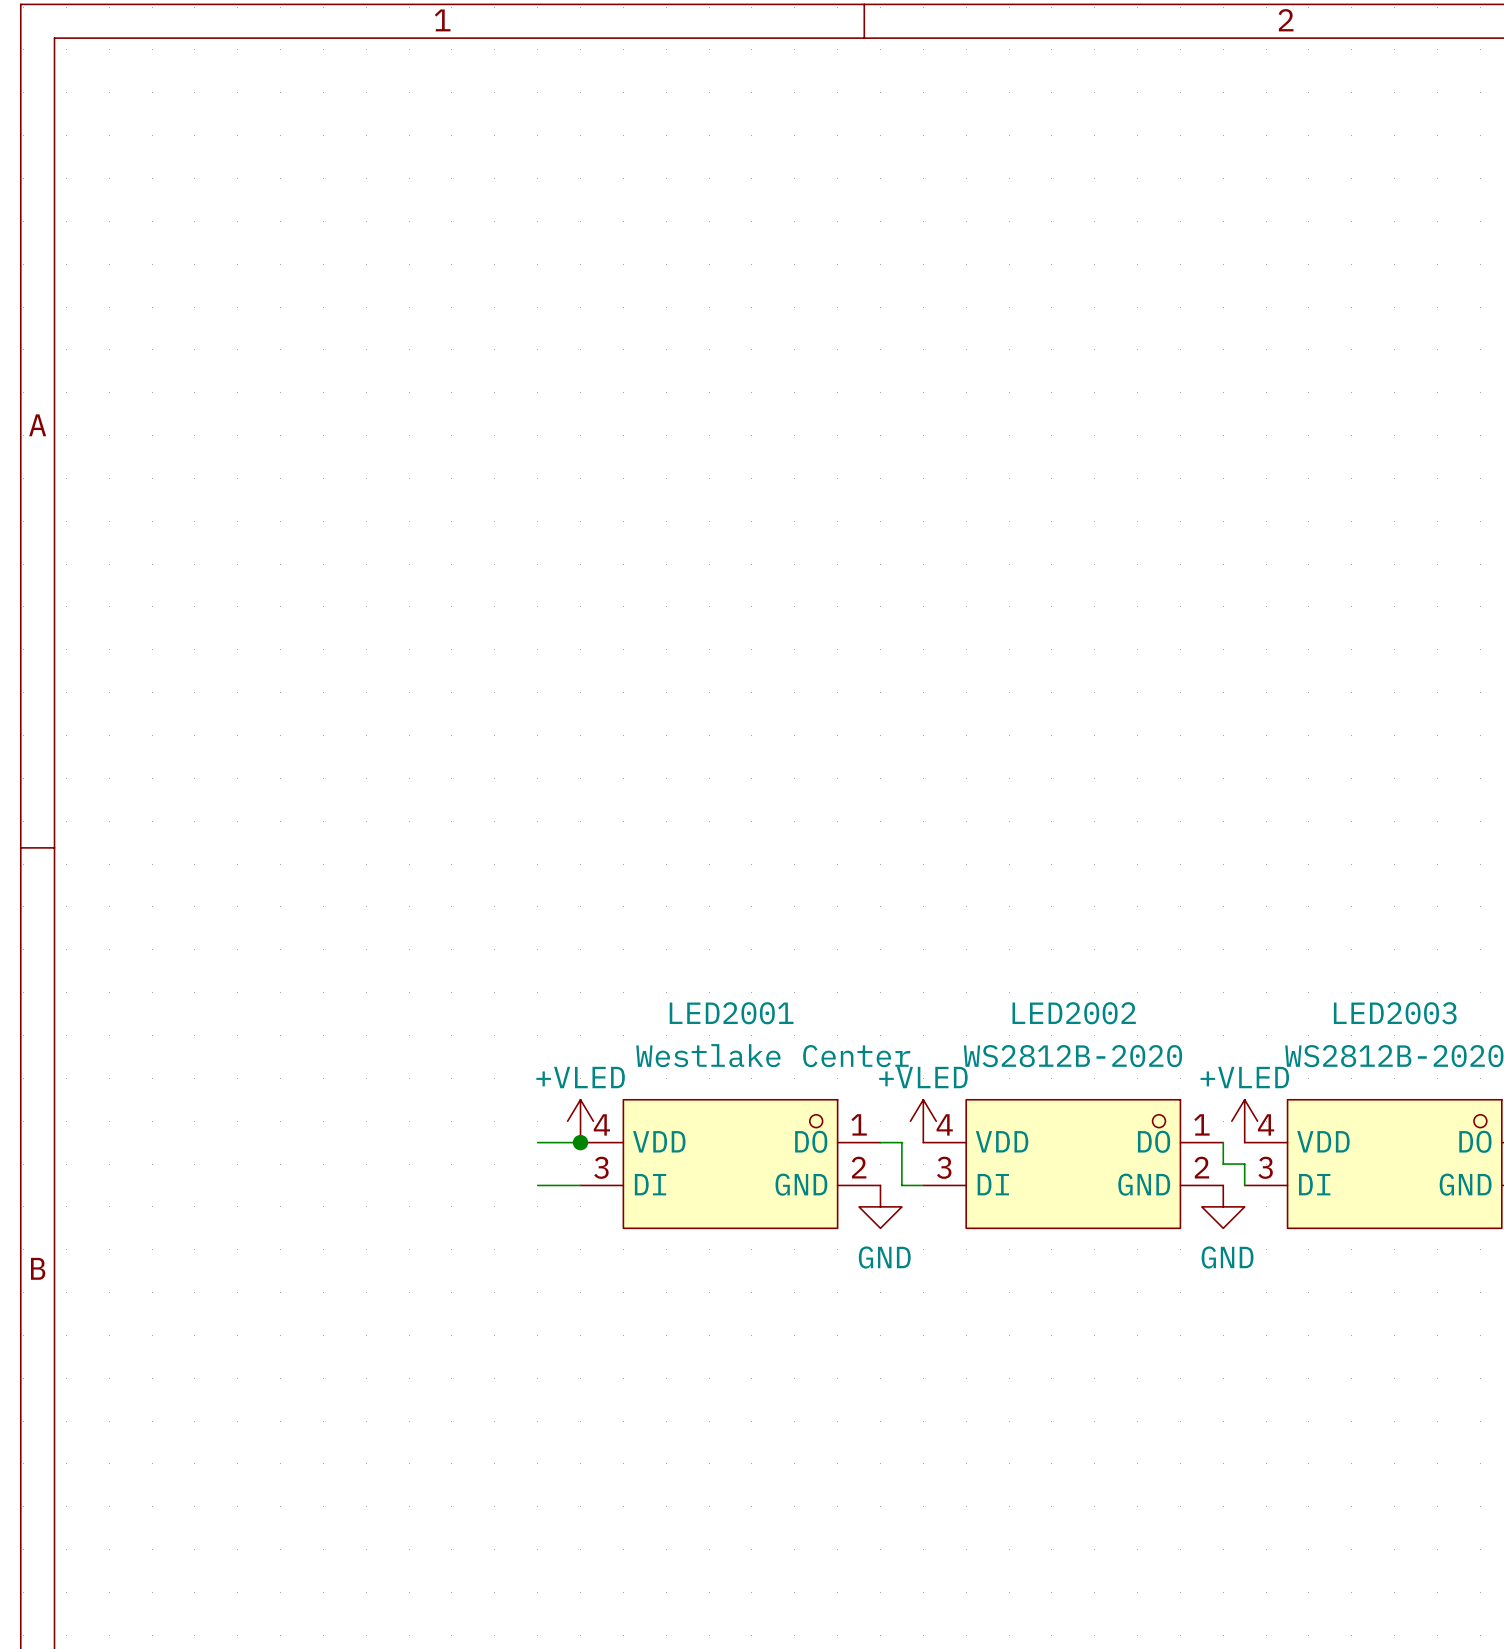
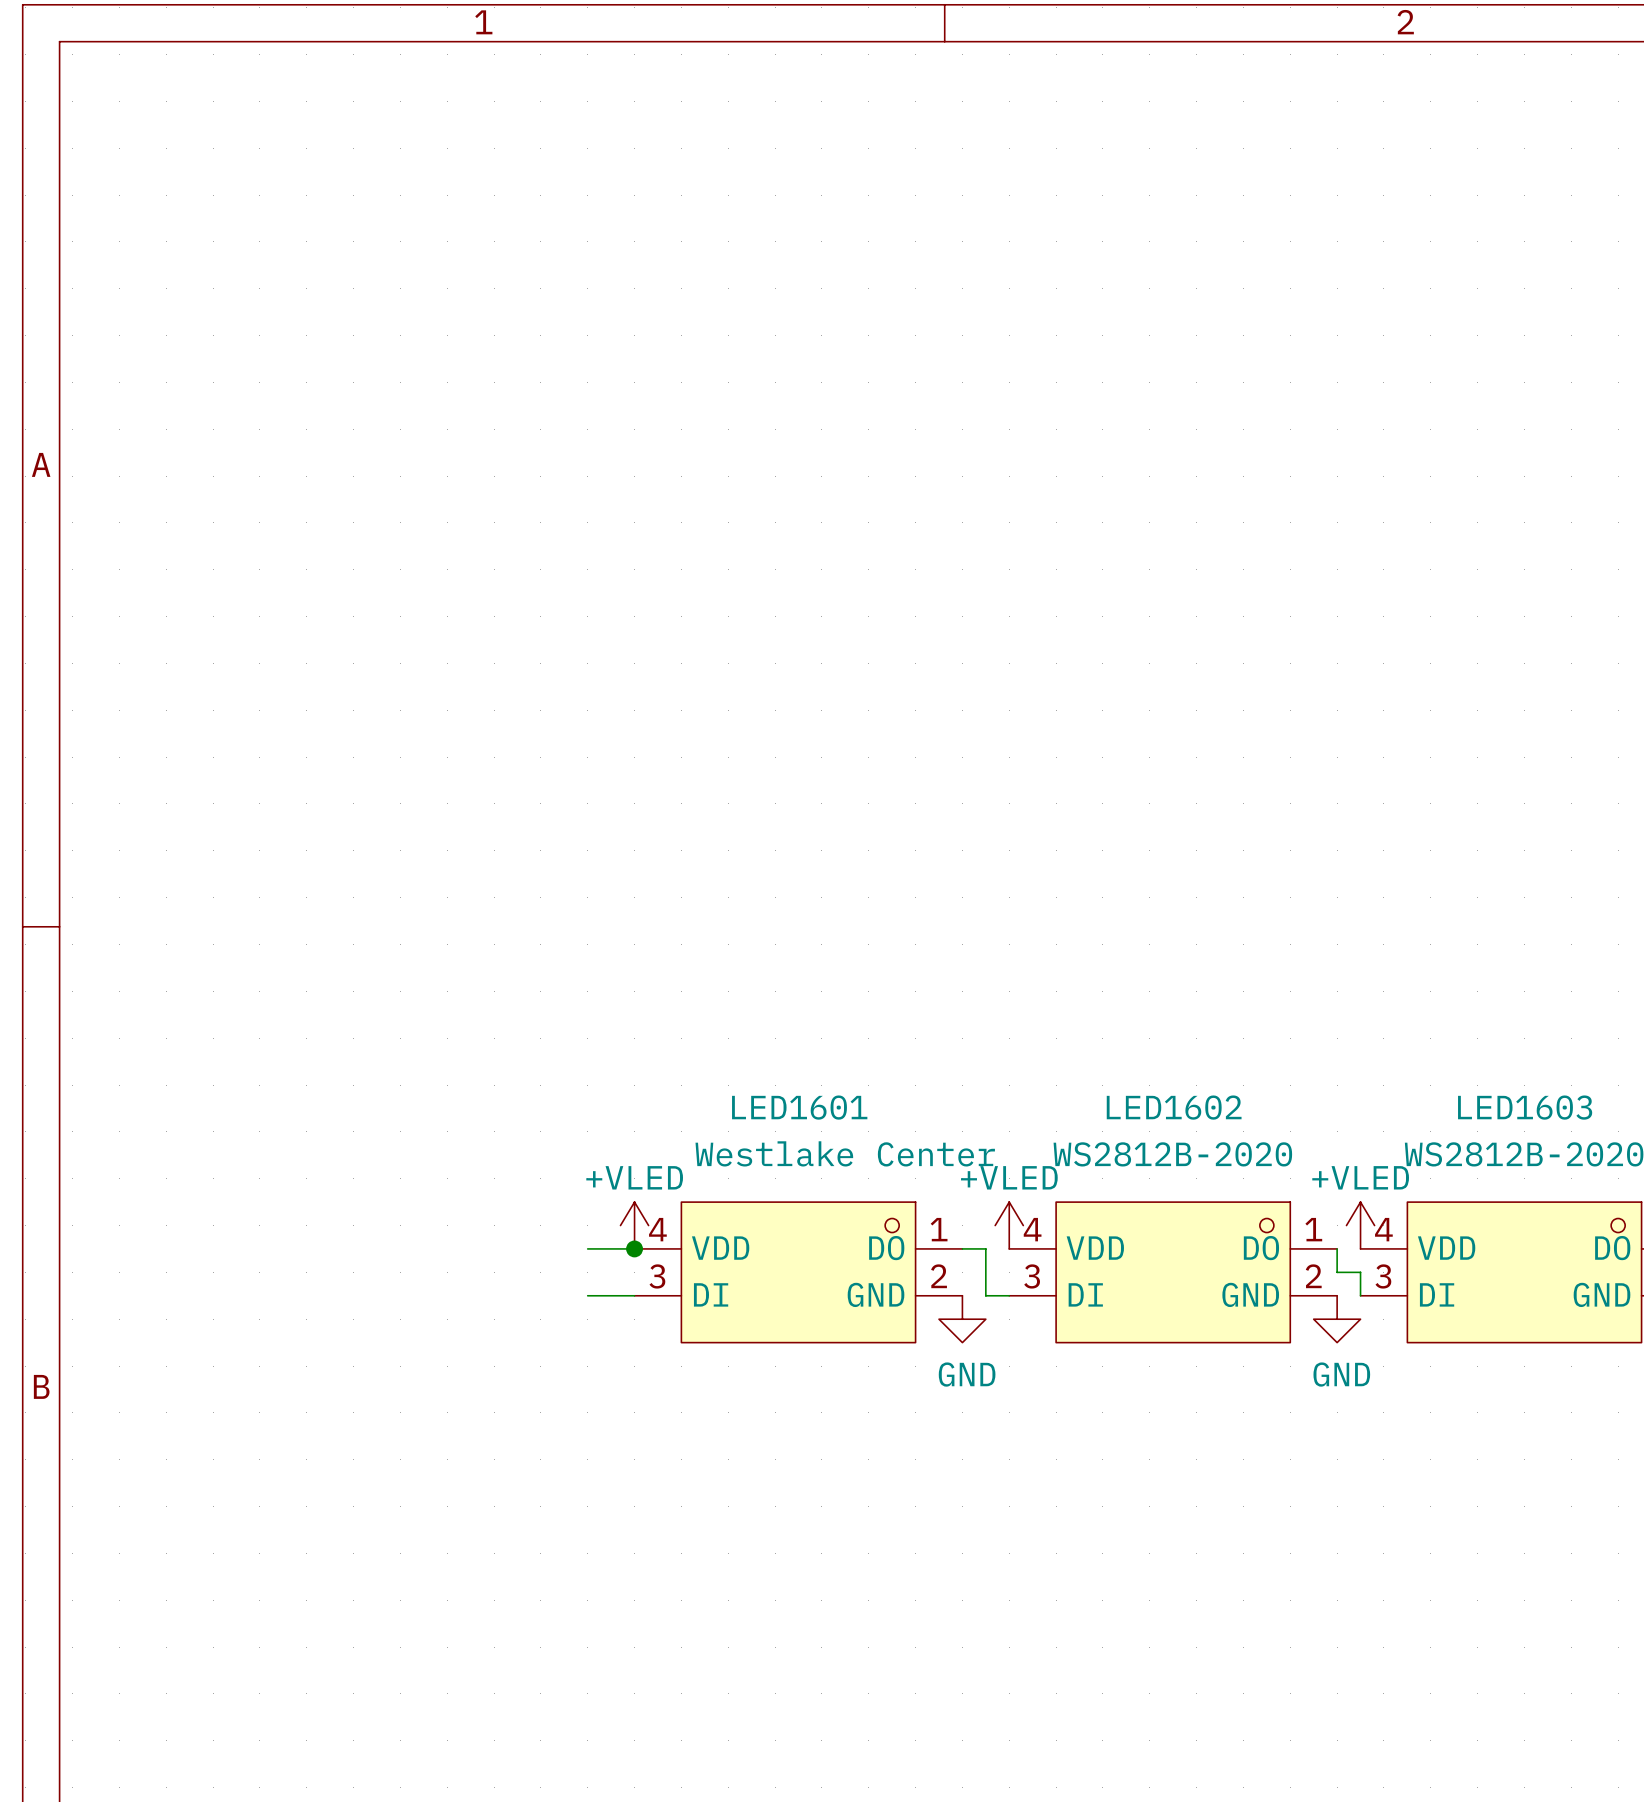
LED2001 name: LED2001 (731, 1013) -> LED1601 (799, 1107)
LED2002 name: LED2002 (1074, 1013) -> LED1602 (1174, 1107)
LED2003 name: LED2003 (1395, 1013) -> LED1603 (1525, 1107)

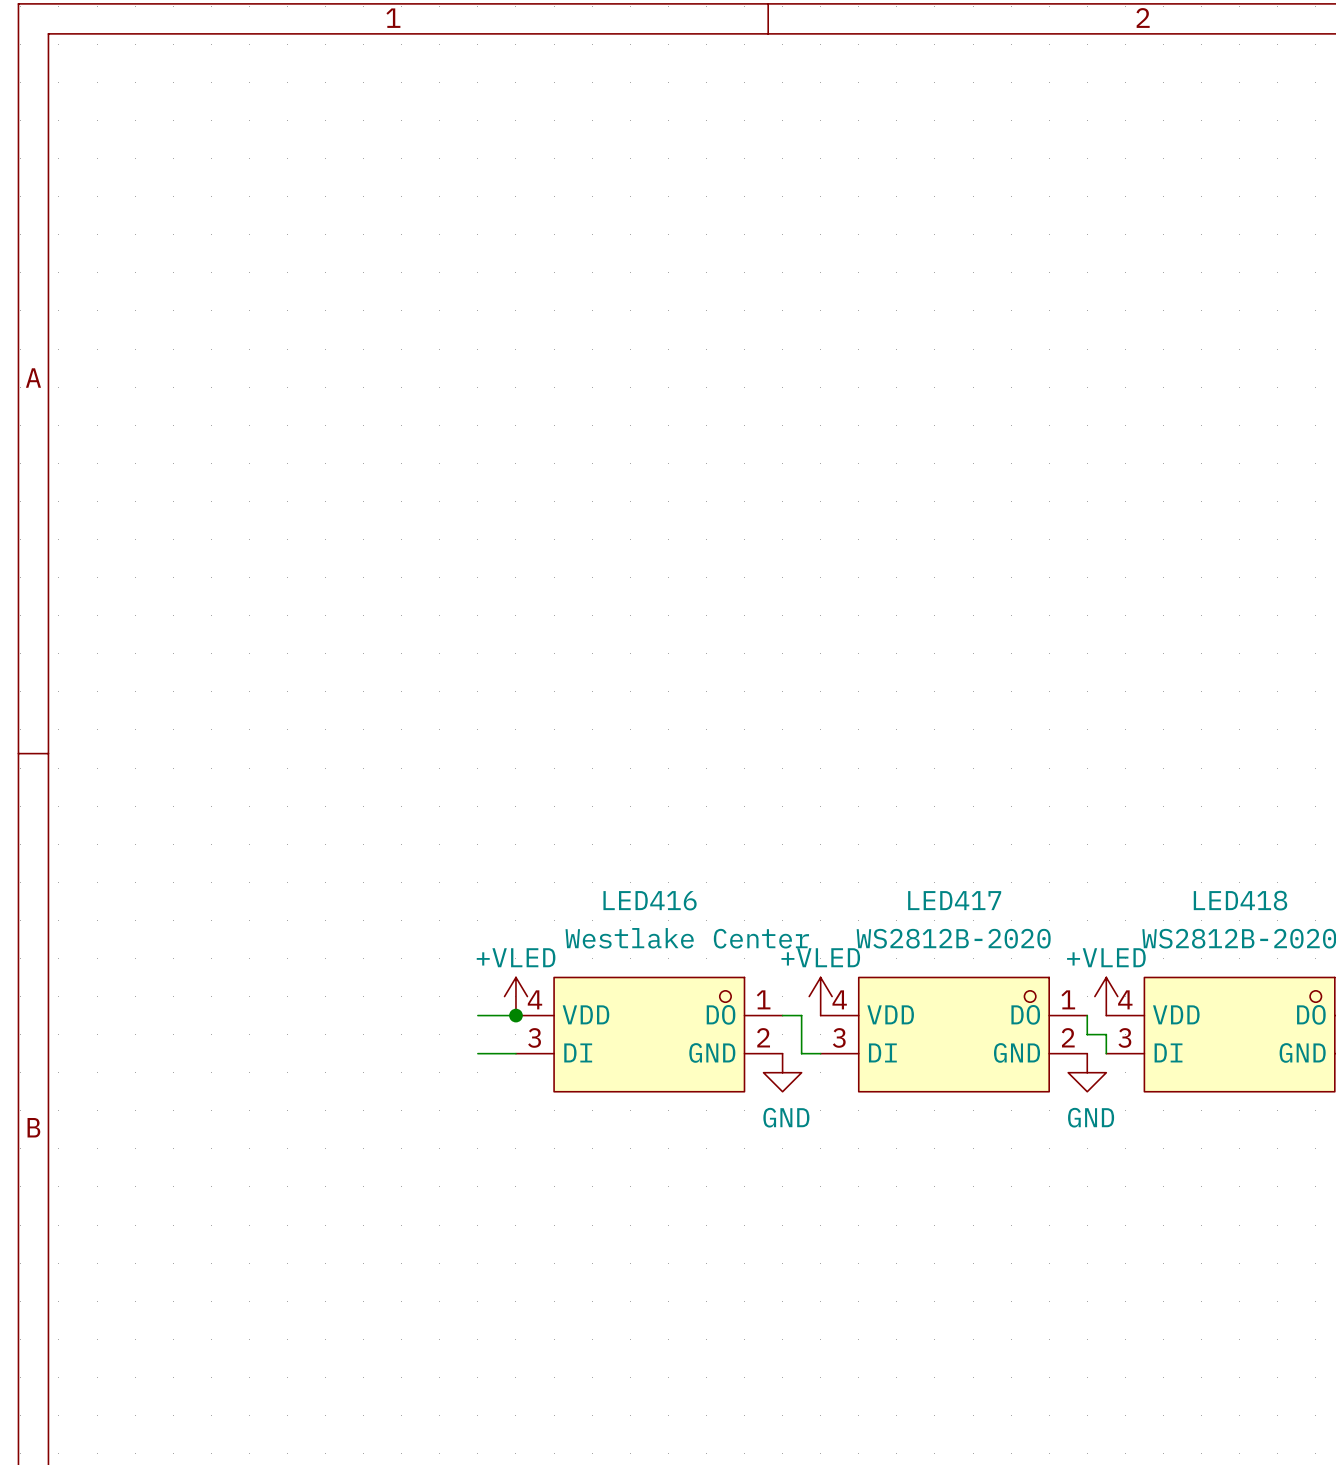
LED1601 name: LED1601 (799, 1107) -> LED416 (650, 900)
LED1602 name: LED1602 (1174, 1107) -> LED417 (954, 900)
LED1603 name: LED1603 (1525, 1107) -> LED418 (1240, 900)

